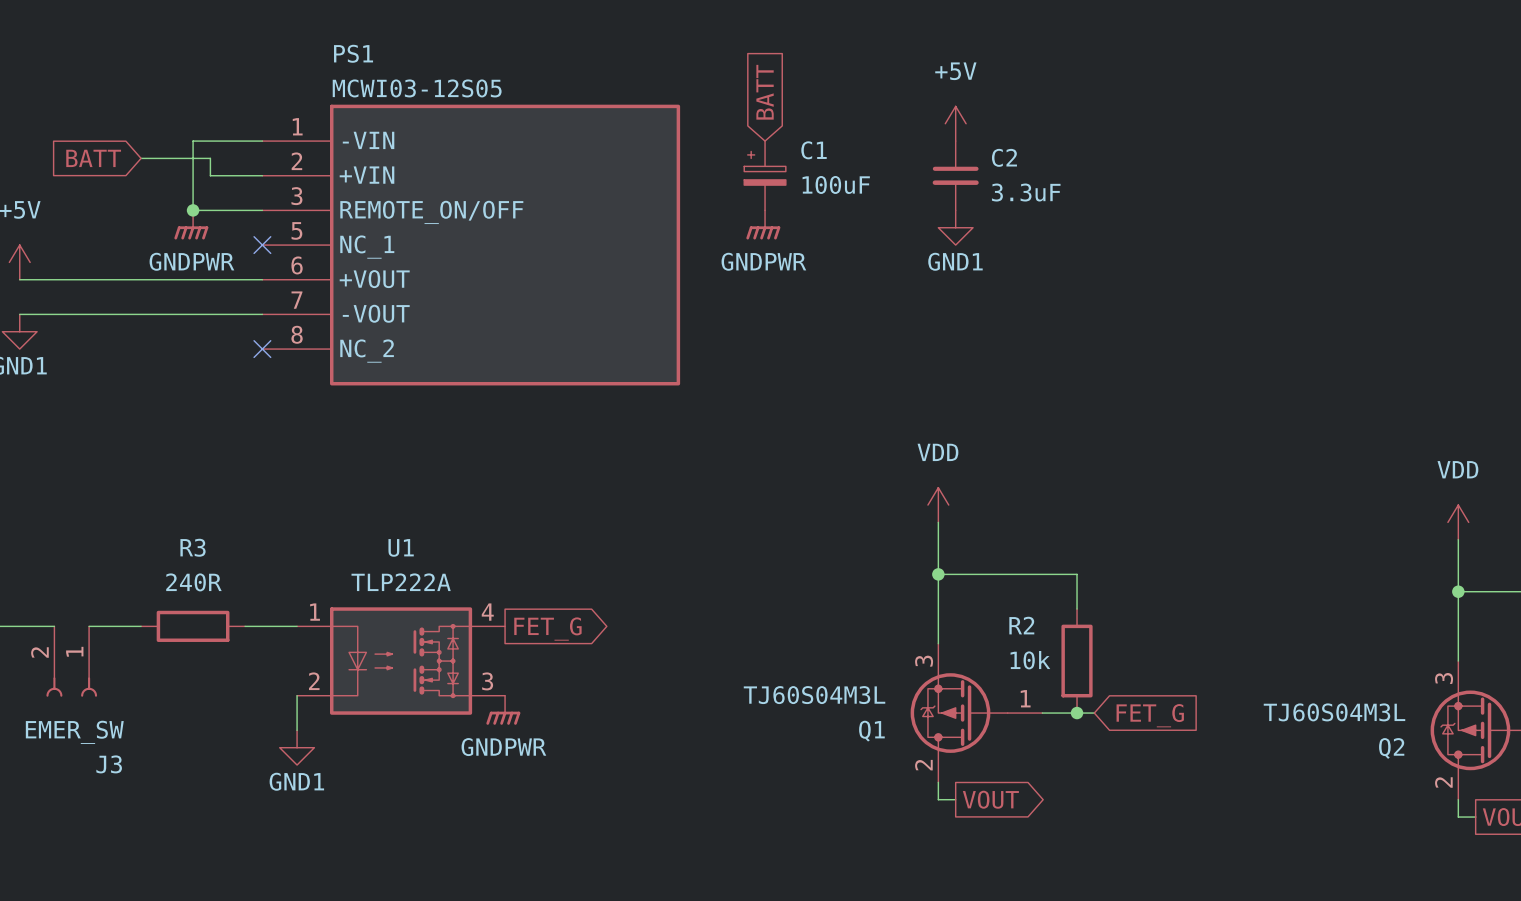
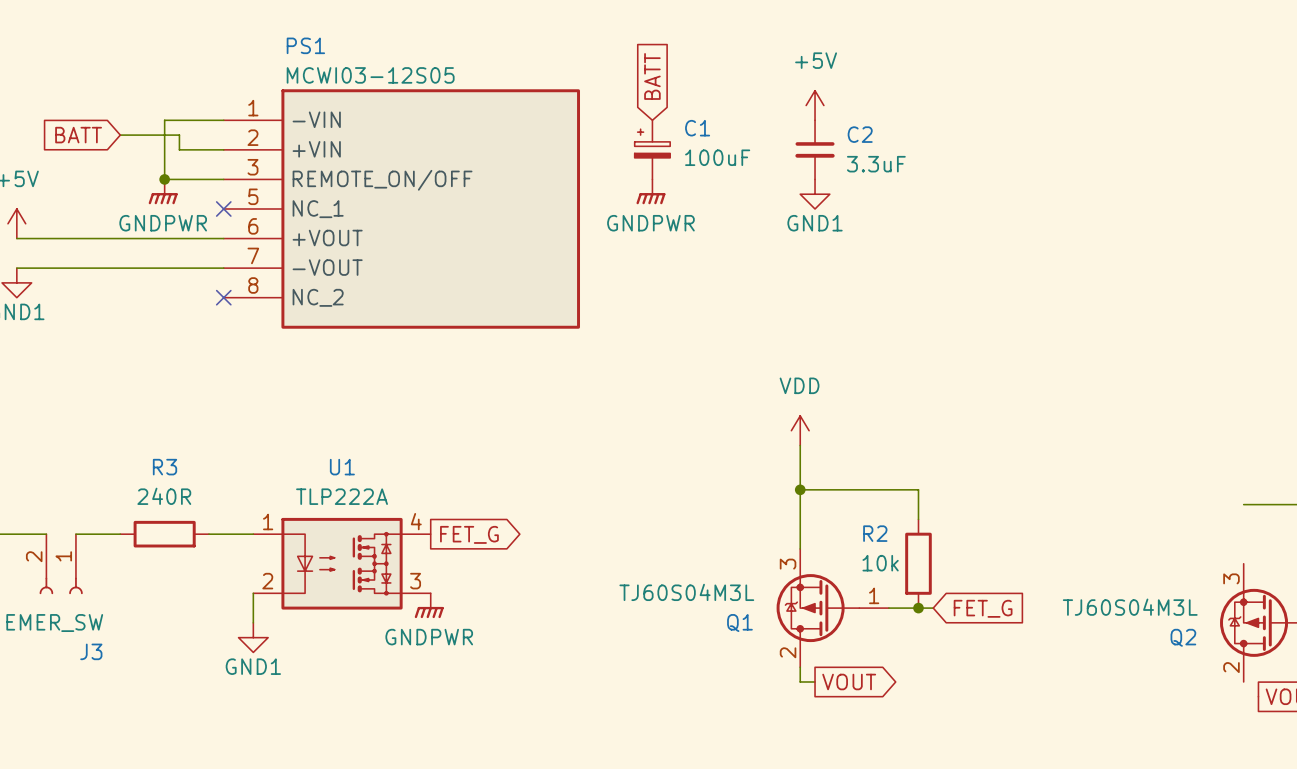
power symbol: VDD (1458, 522) -> none
wire: (1458, 539) (1458, 661) -> none
junction: (1458, 591) -> none
wire: (1458, 799) (1458, 817) (1475, 817) -> none

